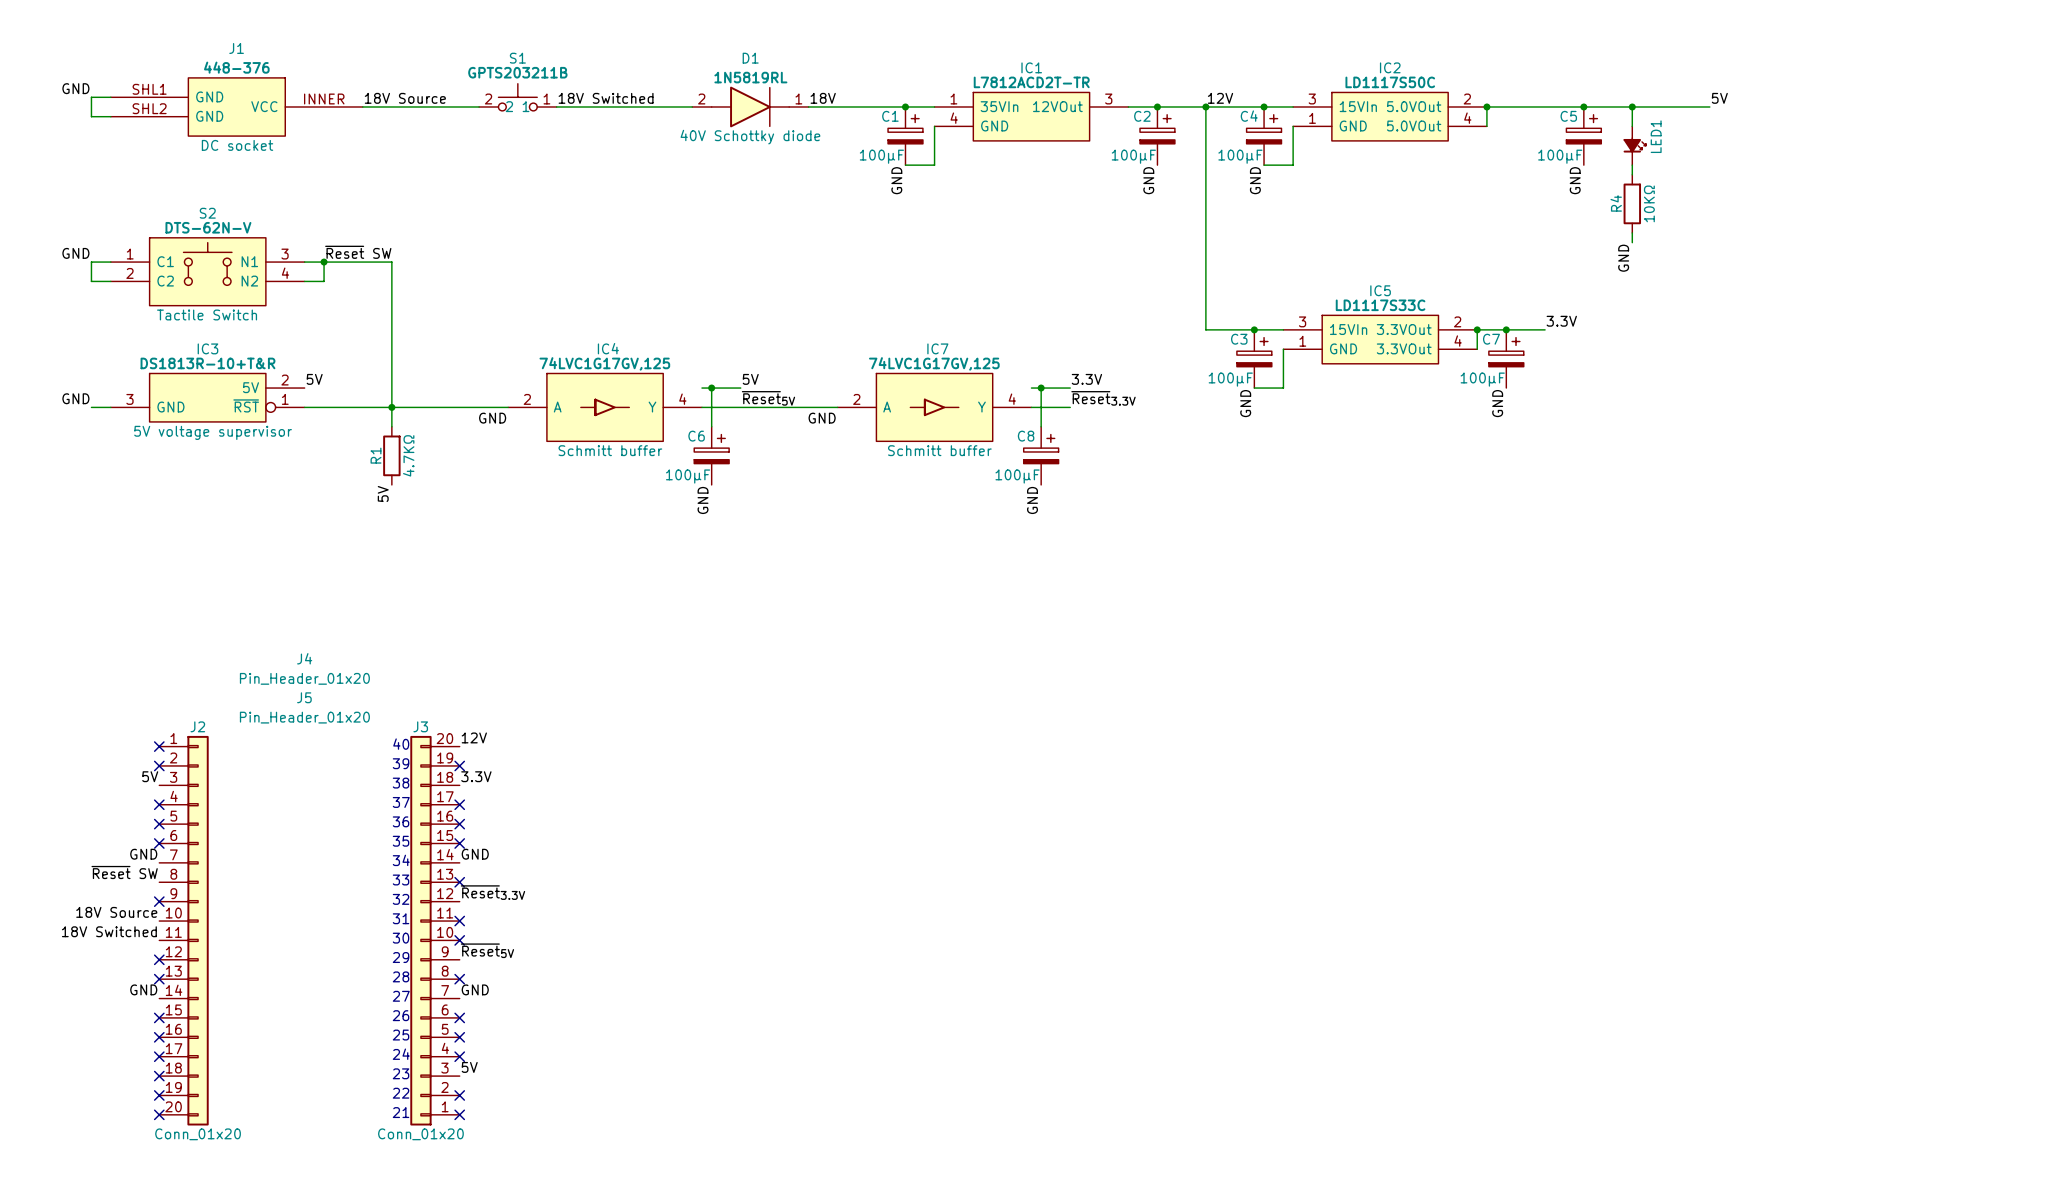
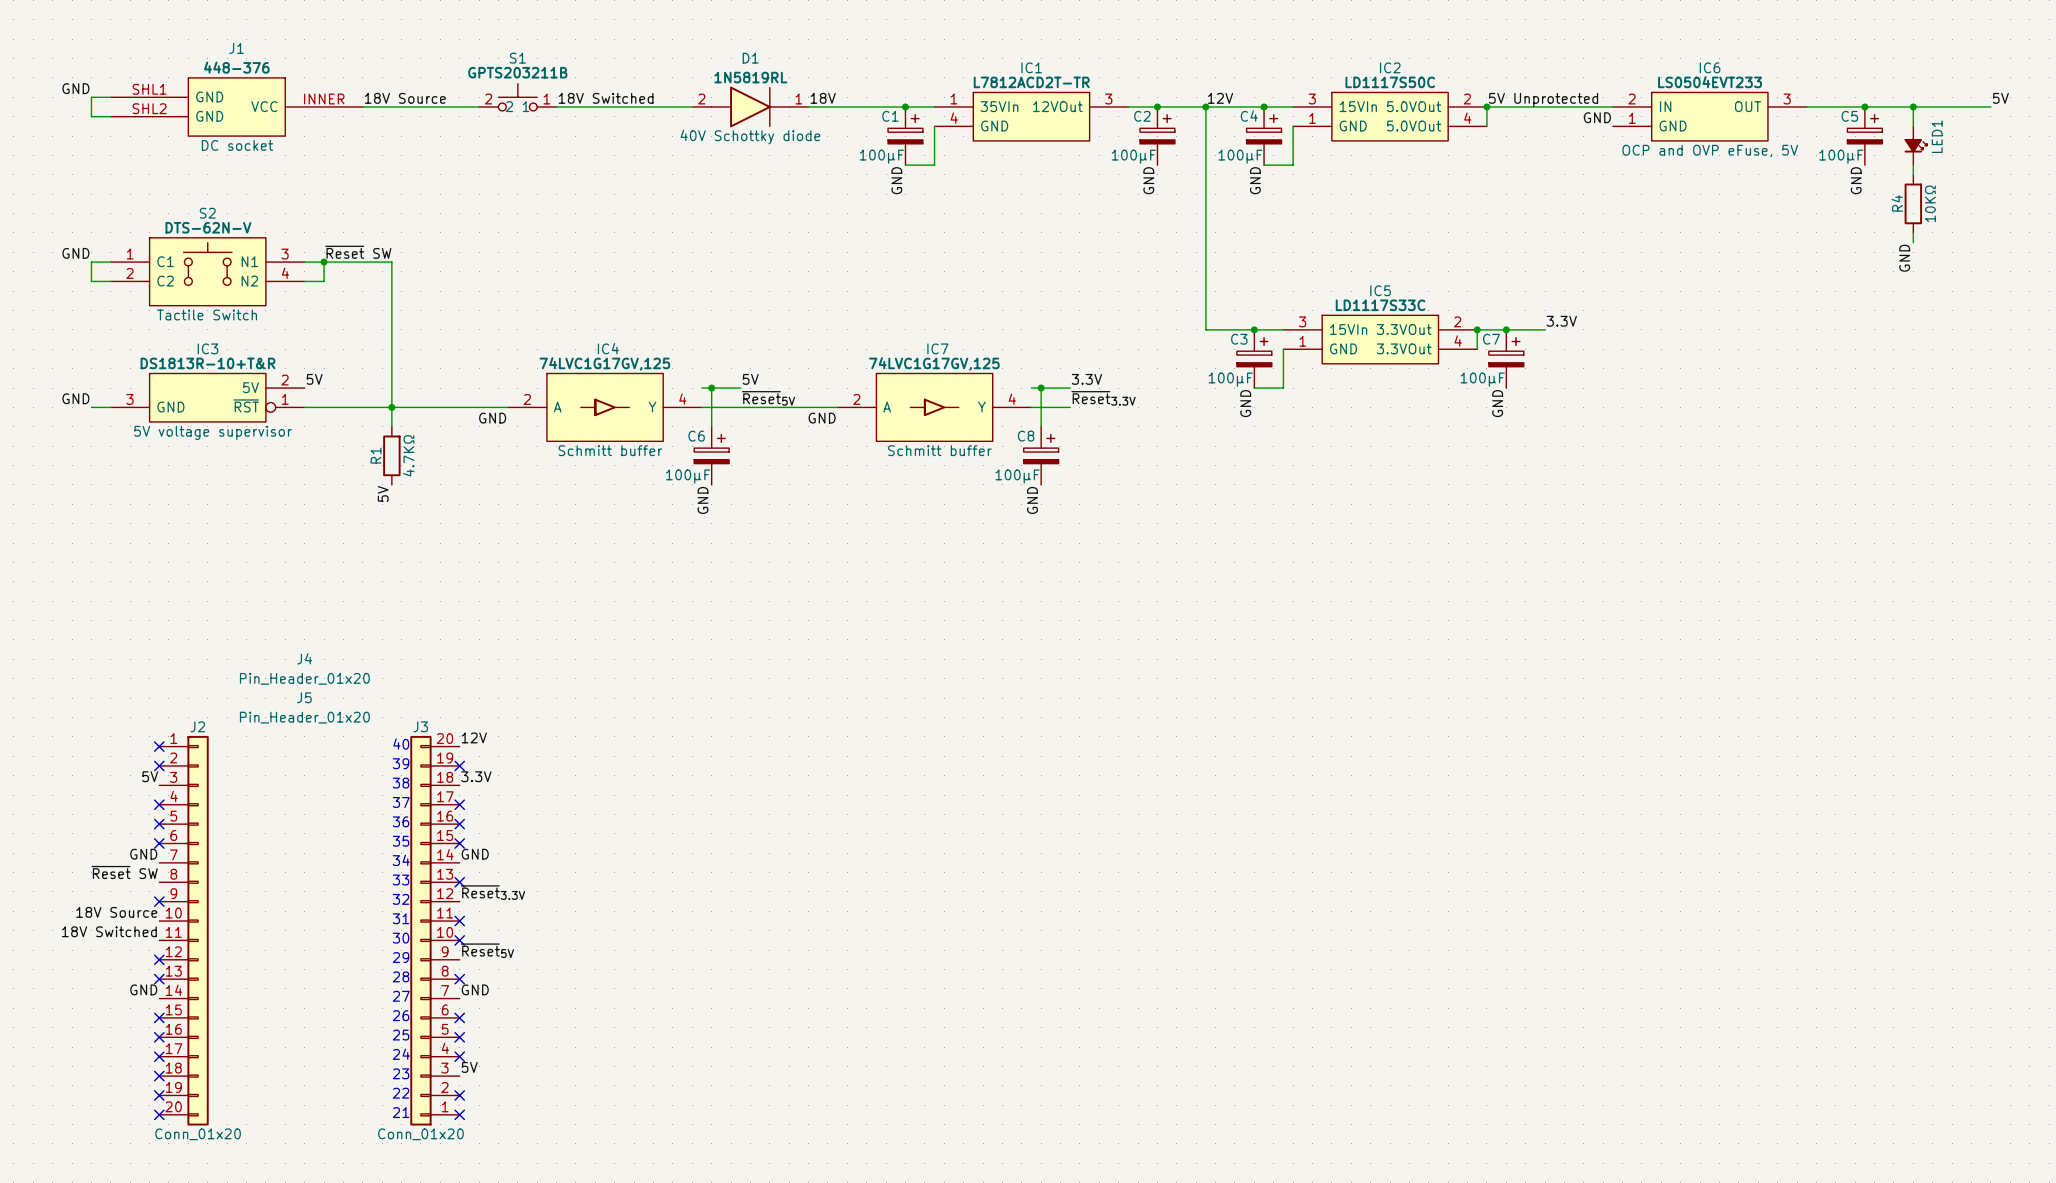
label: 5V (1719, 98) -> none
label: none -> 5V (2000, 98)
label: none -> 5V Unprotected (1543, 99)
junction: (1583, 106) -> none
junction: (1632, 106) -> none
wire: none -> (1806, 106) (1990, 106)
junction: none -> (1864, 106)
wire: none -> (1913, 106) (1913, 126)
junction: none -> (1913, 106)
IC6: none -> LS0504EVT233 (1709, 116)
C5 position: (1583, 136) -> (1864, 136)
LED1 position: (1634, 145) -> (1915, 145)
wire: (1632, 165) (1632, 174) -> none
wire: none -> (1913, 165) (1913, 174)
label rotation: 0° (1575, 180) -> 90° clockwise (1597, 117)
label position: GND (1575, 180) -> GND (1597, 117)
label: none -> GND (1856, 180)
R4 position: (1632, 203) -> (1913, 203)
wire: (1632, 232) (1632, 242) -> none
wire: none -> (1913, 232) (1913, 242)
label: GND (1623, 258) -> none
label: none -> GND (1904, 258)

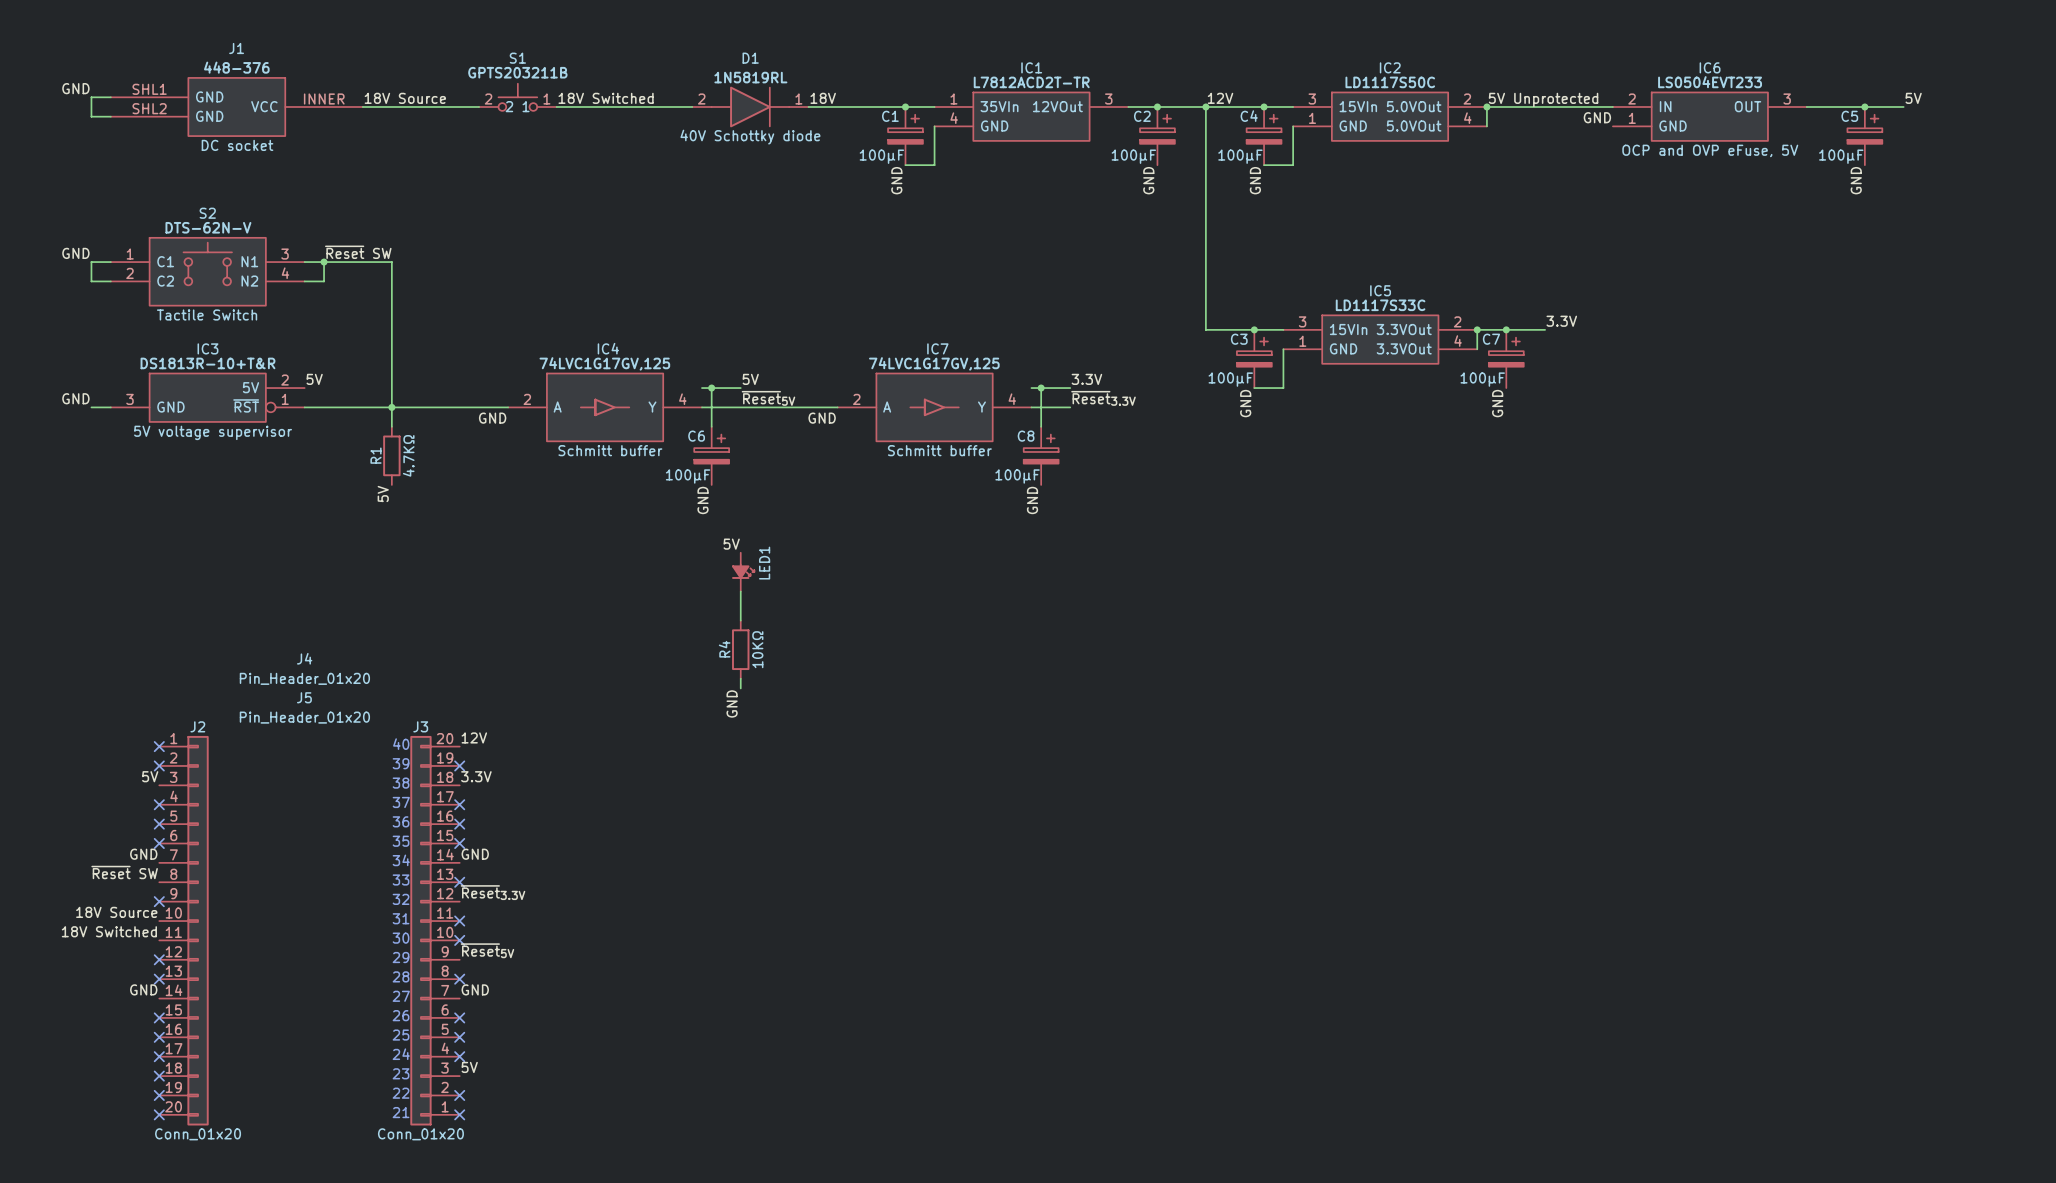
label position: 5V (2000, 98) -> 5V (1913, 98)
wire: (1903, 106) (1990, 106) -> none
wire: (1913, 106) (1913, 126) -> none
junction: (1913, 106) -> none
LED1 position: (1915, 145) -> (743, 572)
wire: (1913, 165) (1913, 174) -> none
R4 position: (1913, 203) -> (740, 649)
wire: (1913, 232) (1913, 242) -> none
label: GND (1904, 258) -> none
label: none -> 5V (731, 544)
wire: none -> (740, 591) (740, 620)
wire: none -> (740, 678) (740, 688)
label: none -> GND (732, 703)

